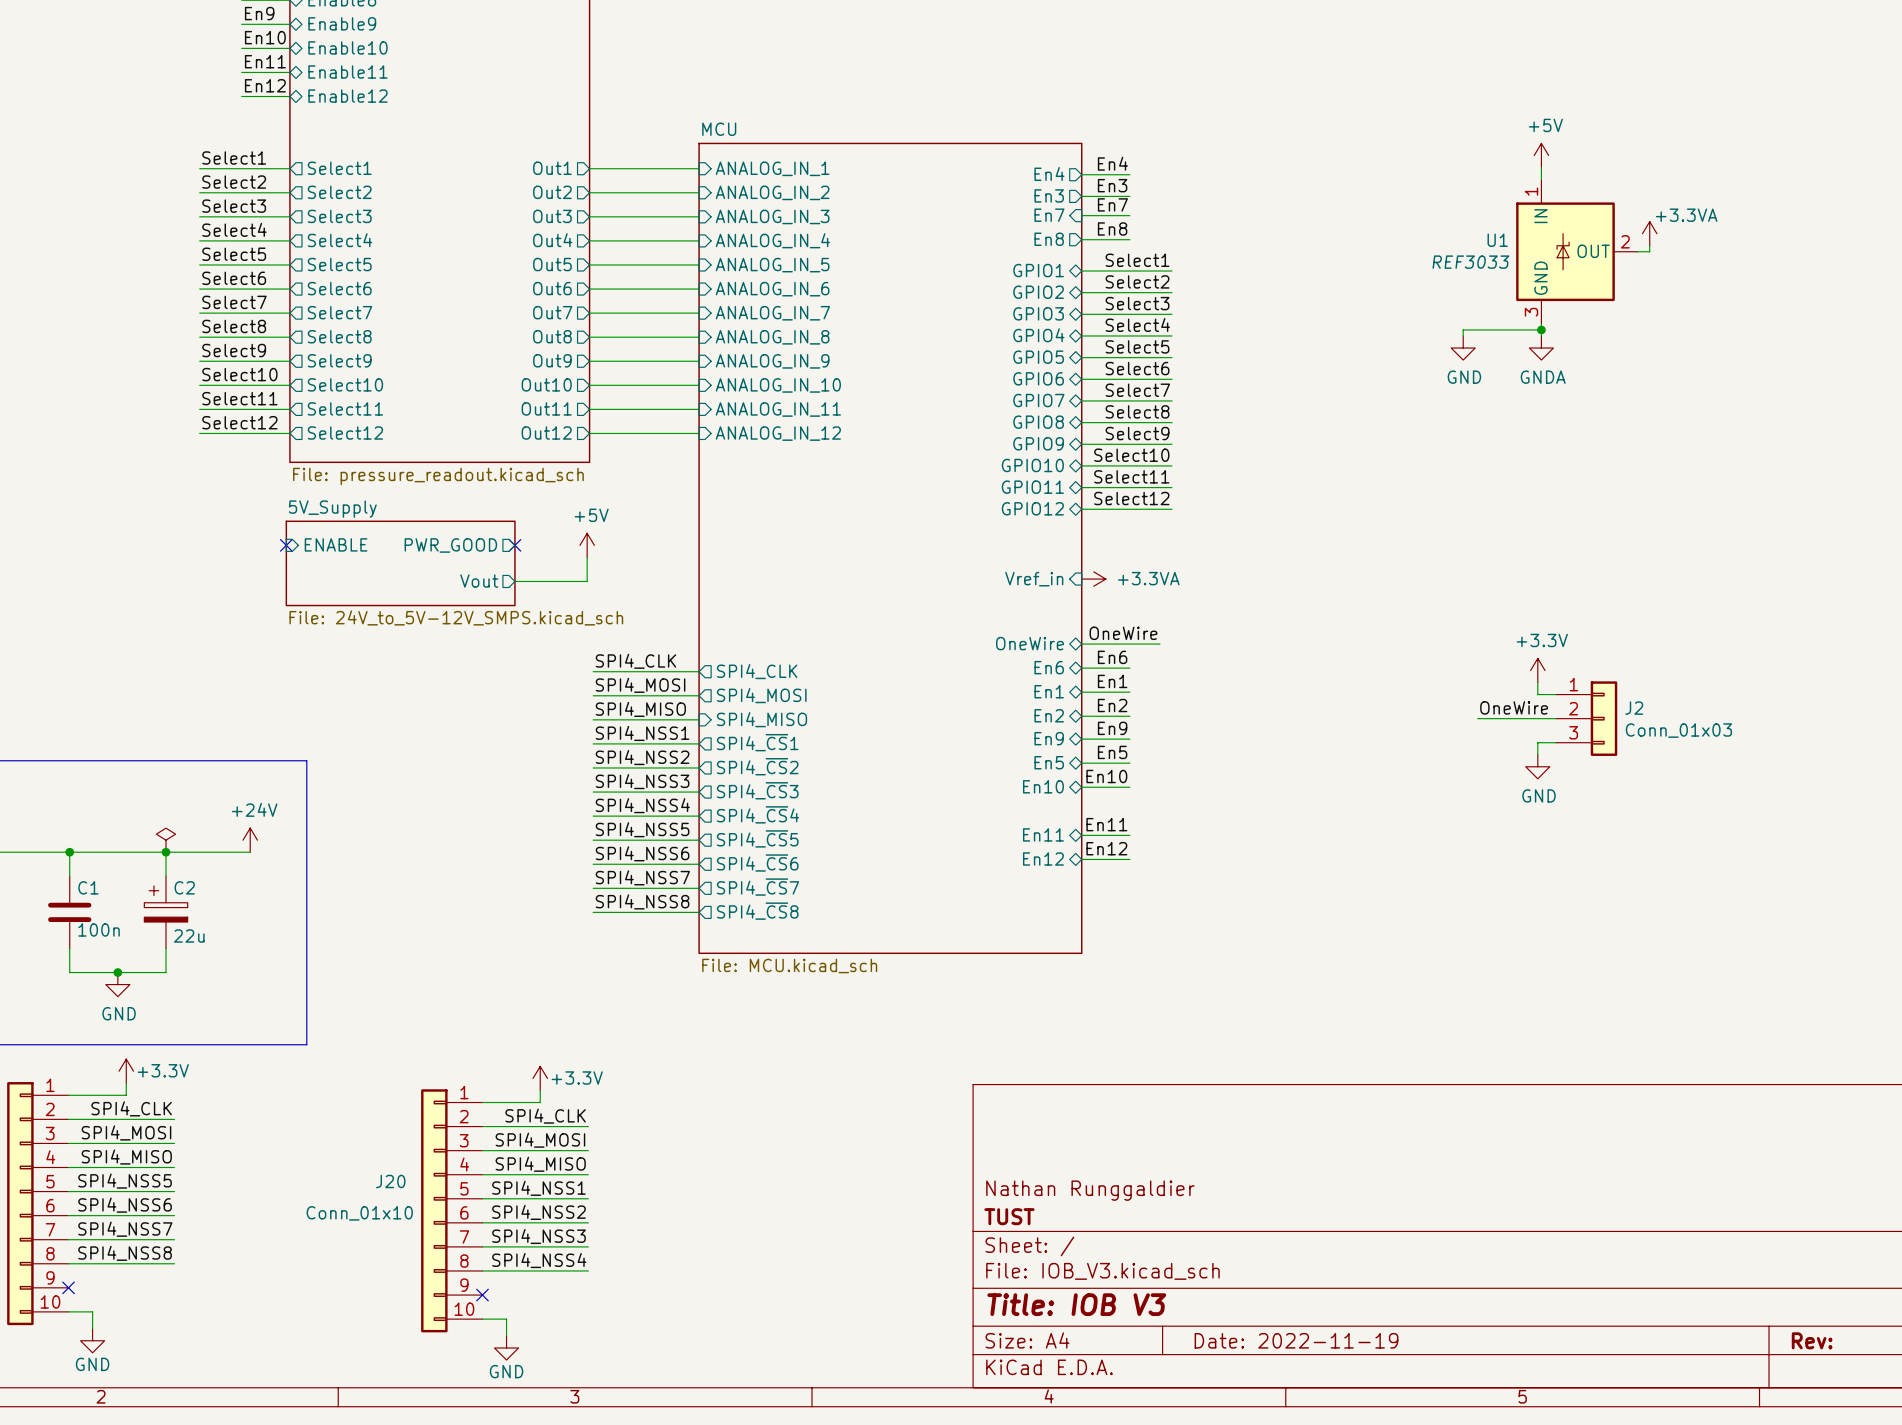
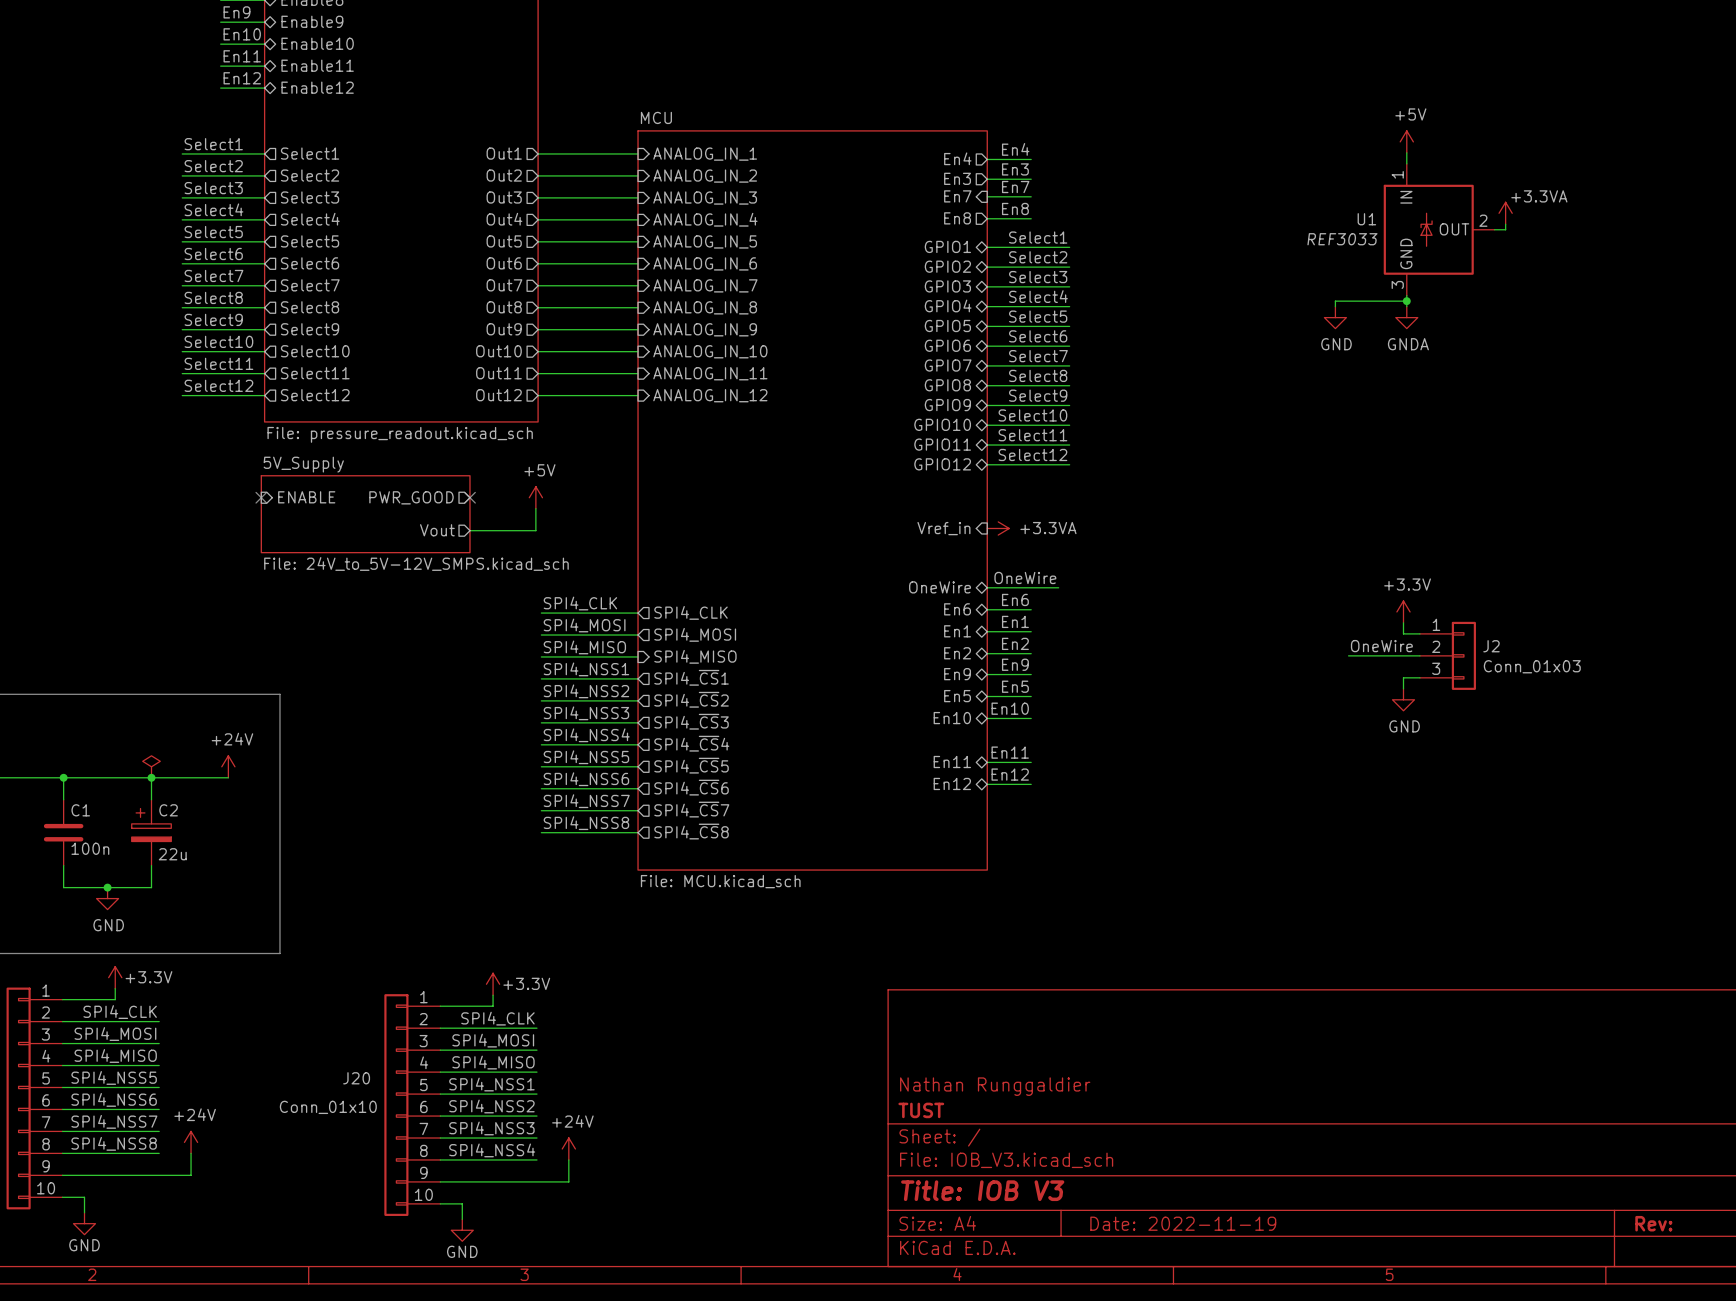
power symbol: none -> +24V (191, 1142)
power symbol: none -> +24V (568, 1148)
wire: none -> (191, 1153) (191, 1175) (62, 1175)
wire: none -> (568, 1159) (568, 1181) (440, 1181)
no-connect mark: (68, 1287) -> none
no-connect mark: (482, 1295) -> none

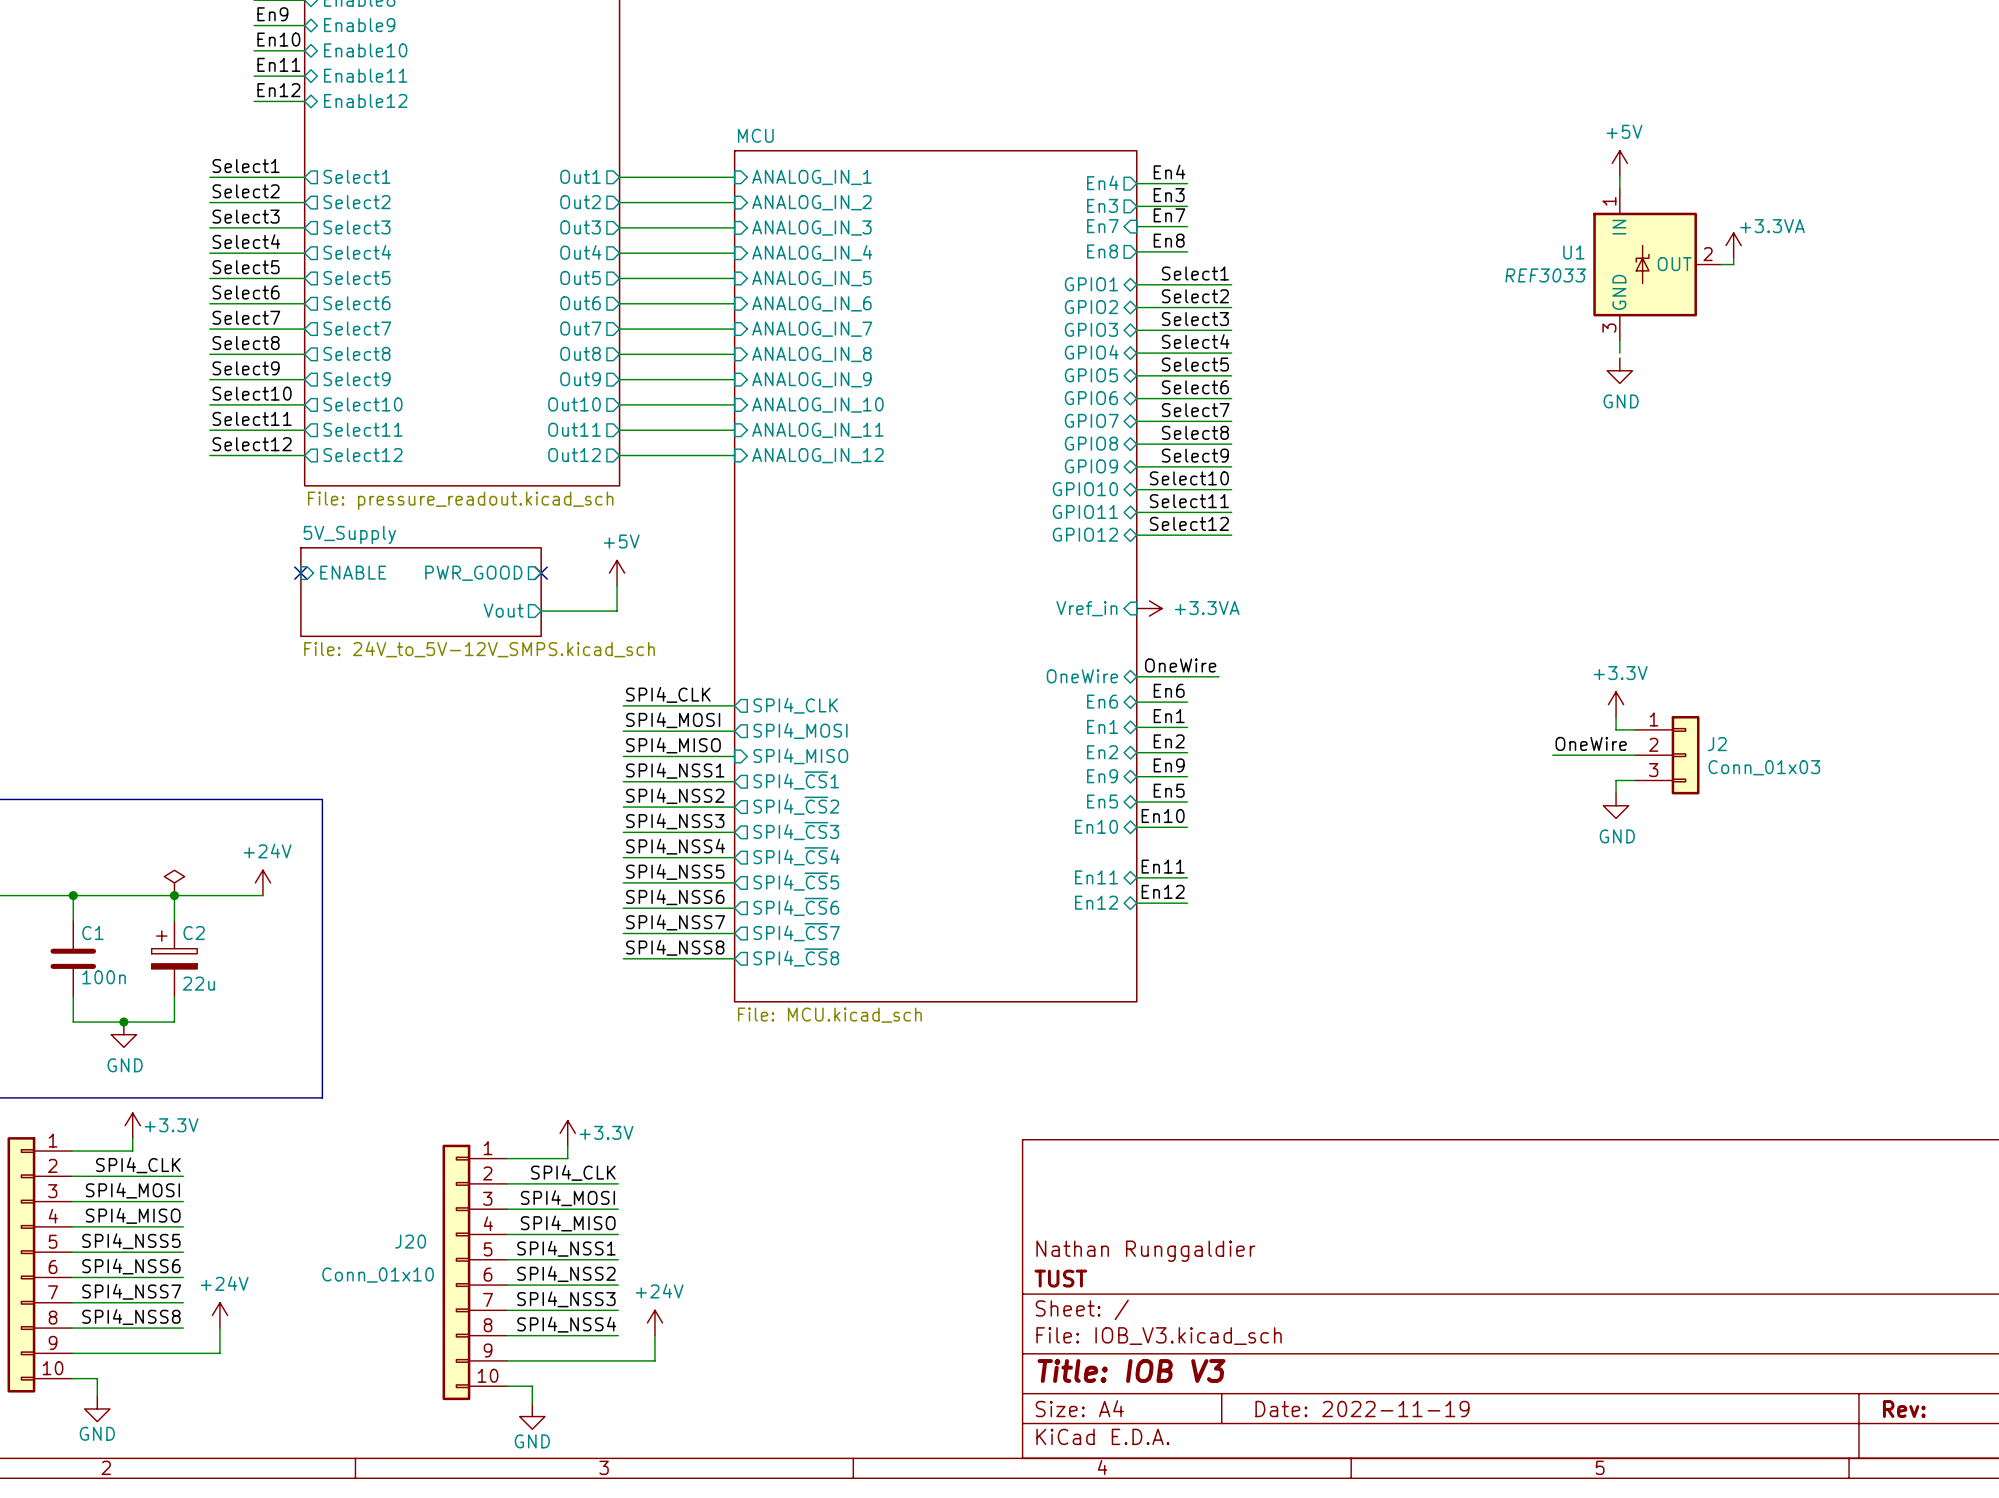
wire: (1406, 301) (1335, 301) (1335, 306) -> none
junction: (1406, 301) -> none
power symbol: GND (1335, 317) -> none
power symbol: GNDA (1406, 317) -> GND (1619, 370)

